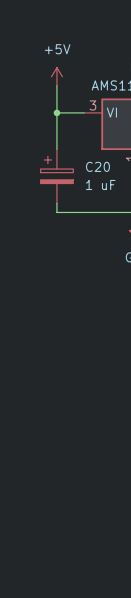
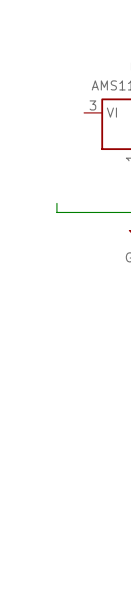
power symbol: +5V (56, 76) -> none
wire: (56, 85) (56, 149) -> none
wire: (56, 112) (84, 112) -> none
junction: (56, 112) -> none
C20: 1 uF (56, 176) -> none

